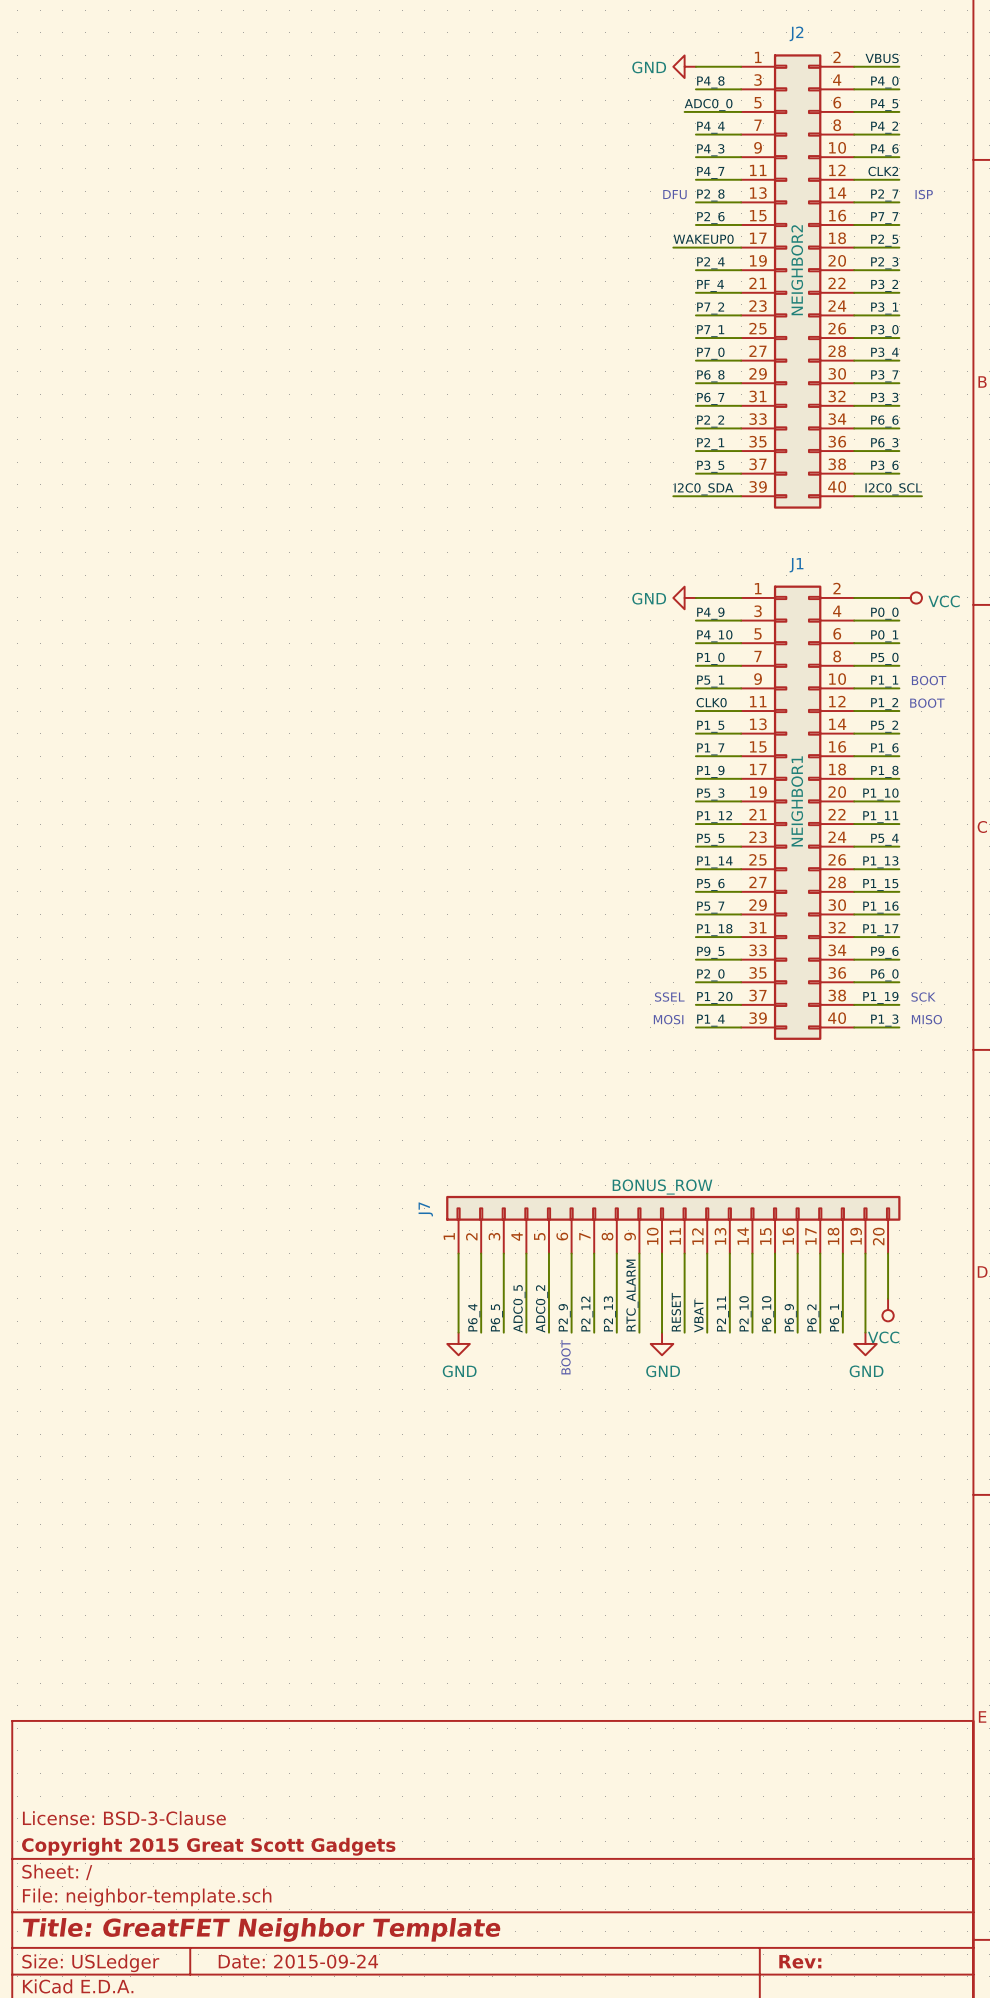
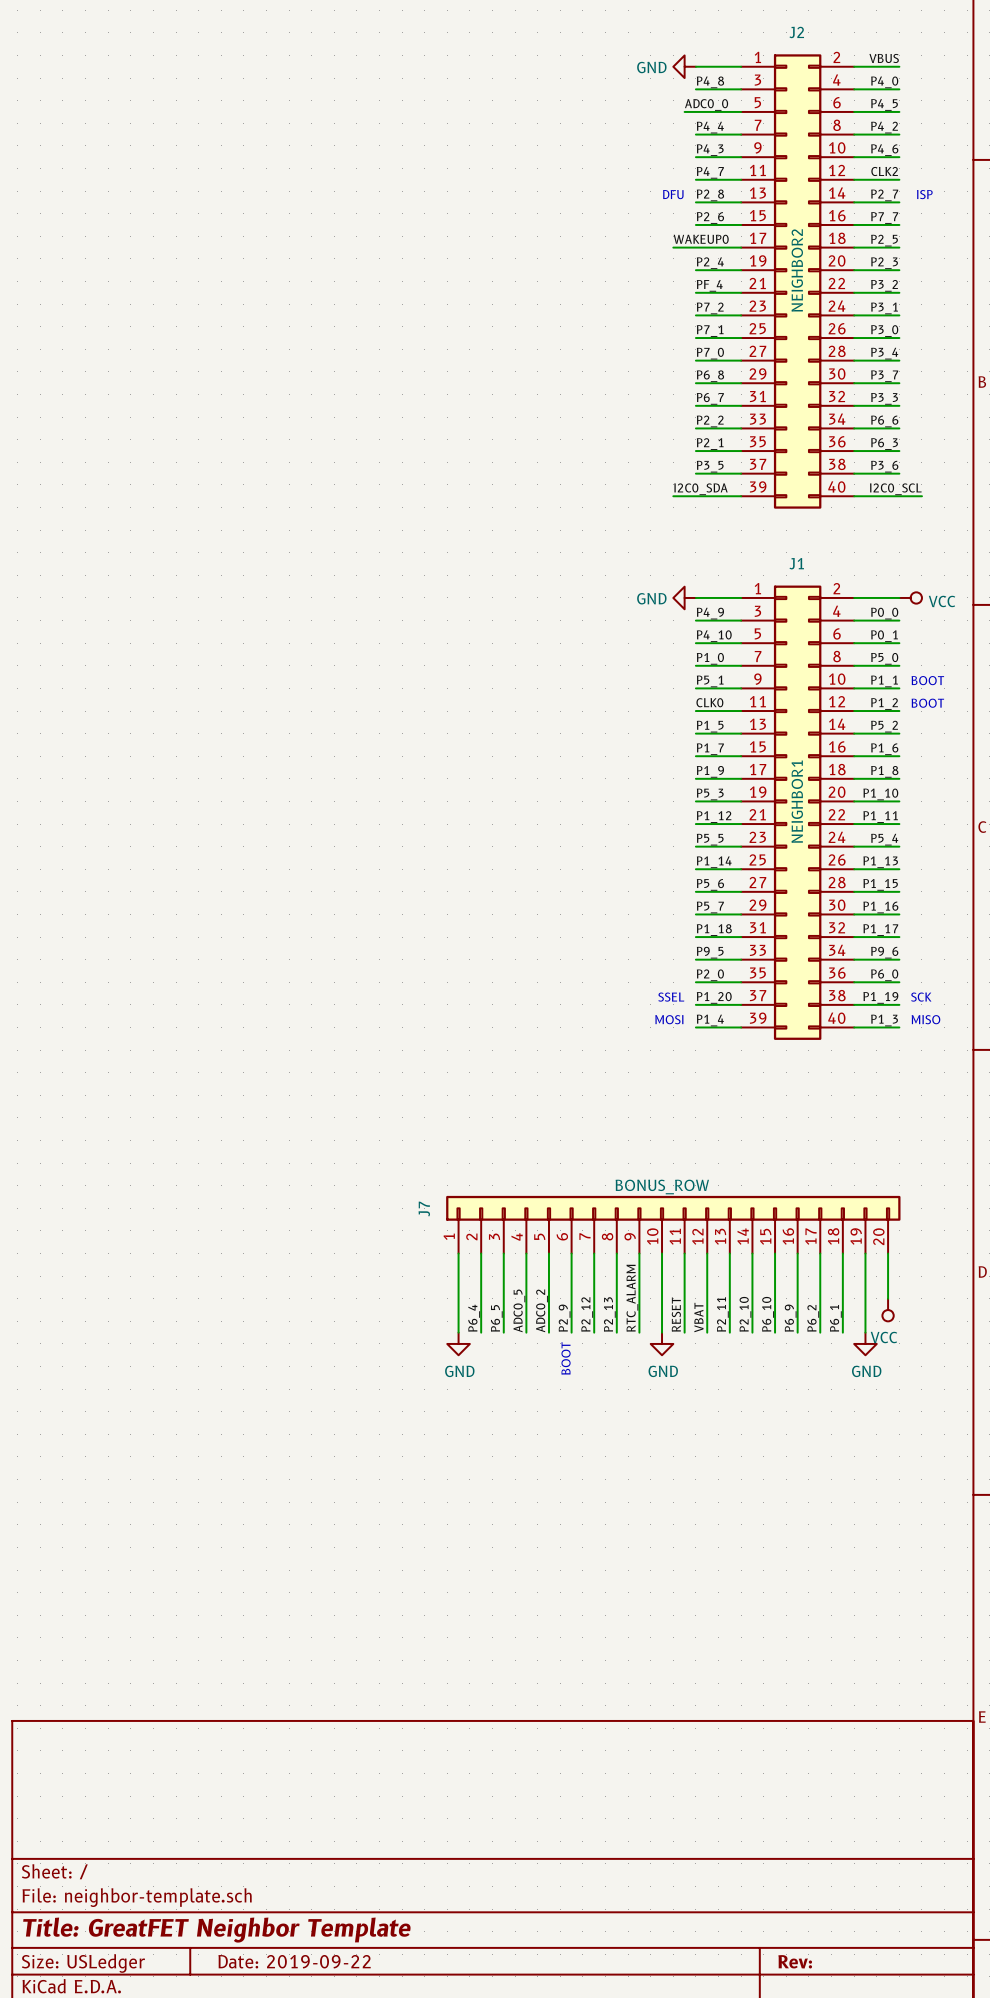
title block: License: BSD-3-Clause (124, 1818) -> none
title block: Copyright 2015 Great Scott Gadgets (208, 1846) -> none
title block: Date: 2015-09-24 (298, 1961) -> Date: 2019-09-22 (294, 1961)

